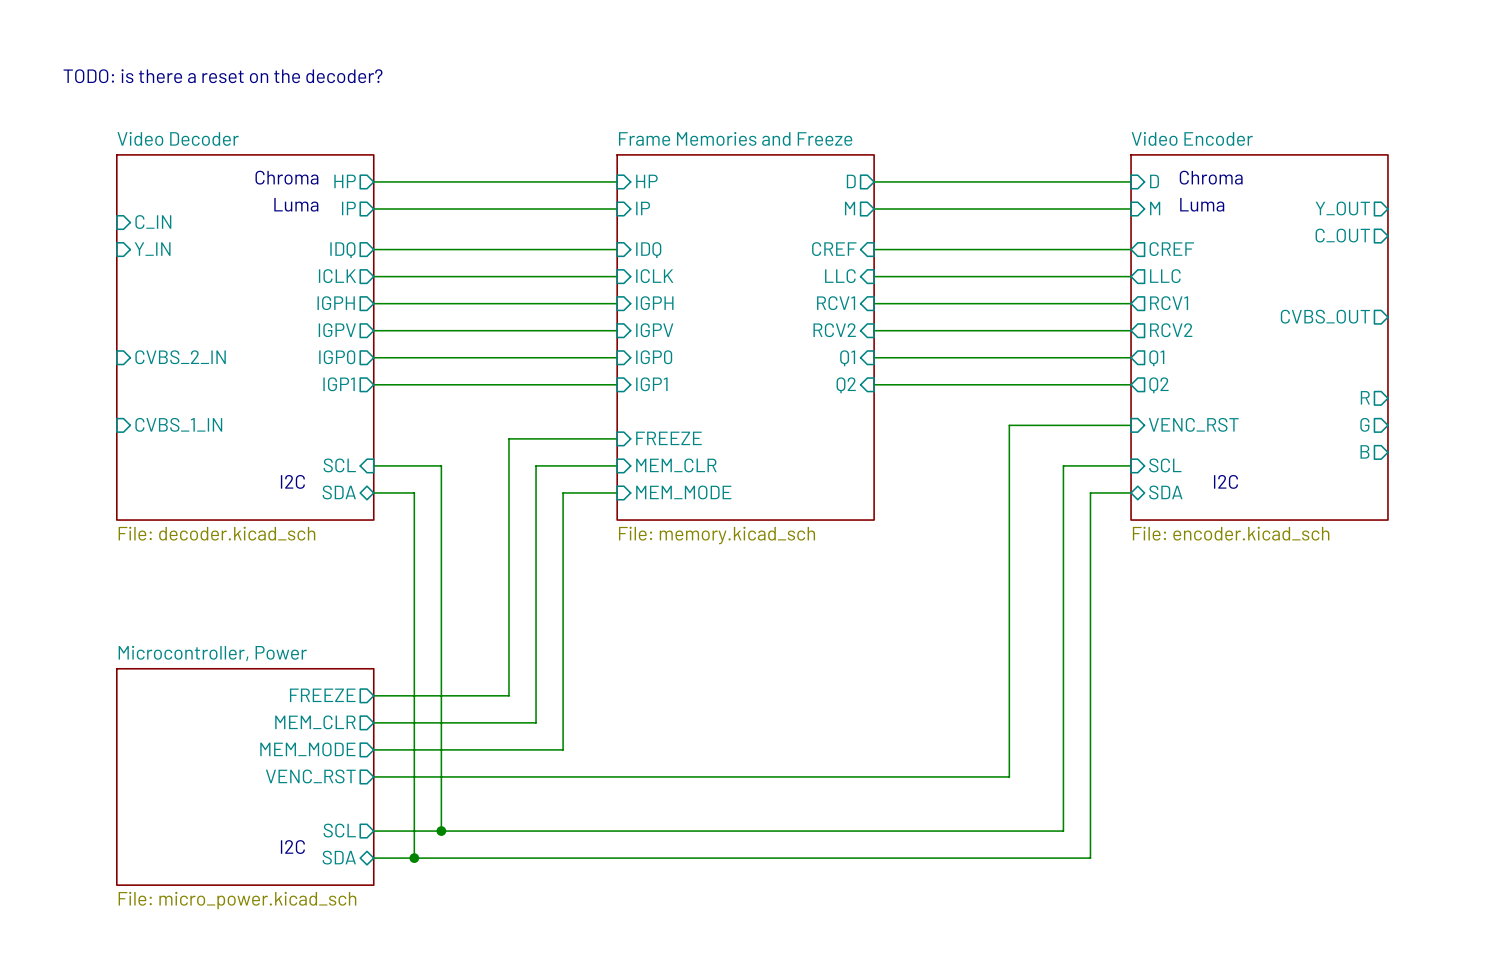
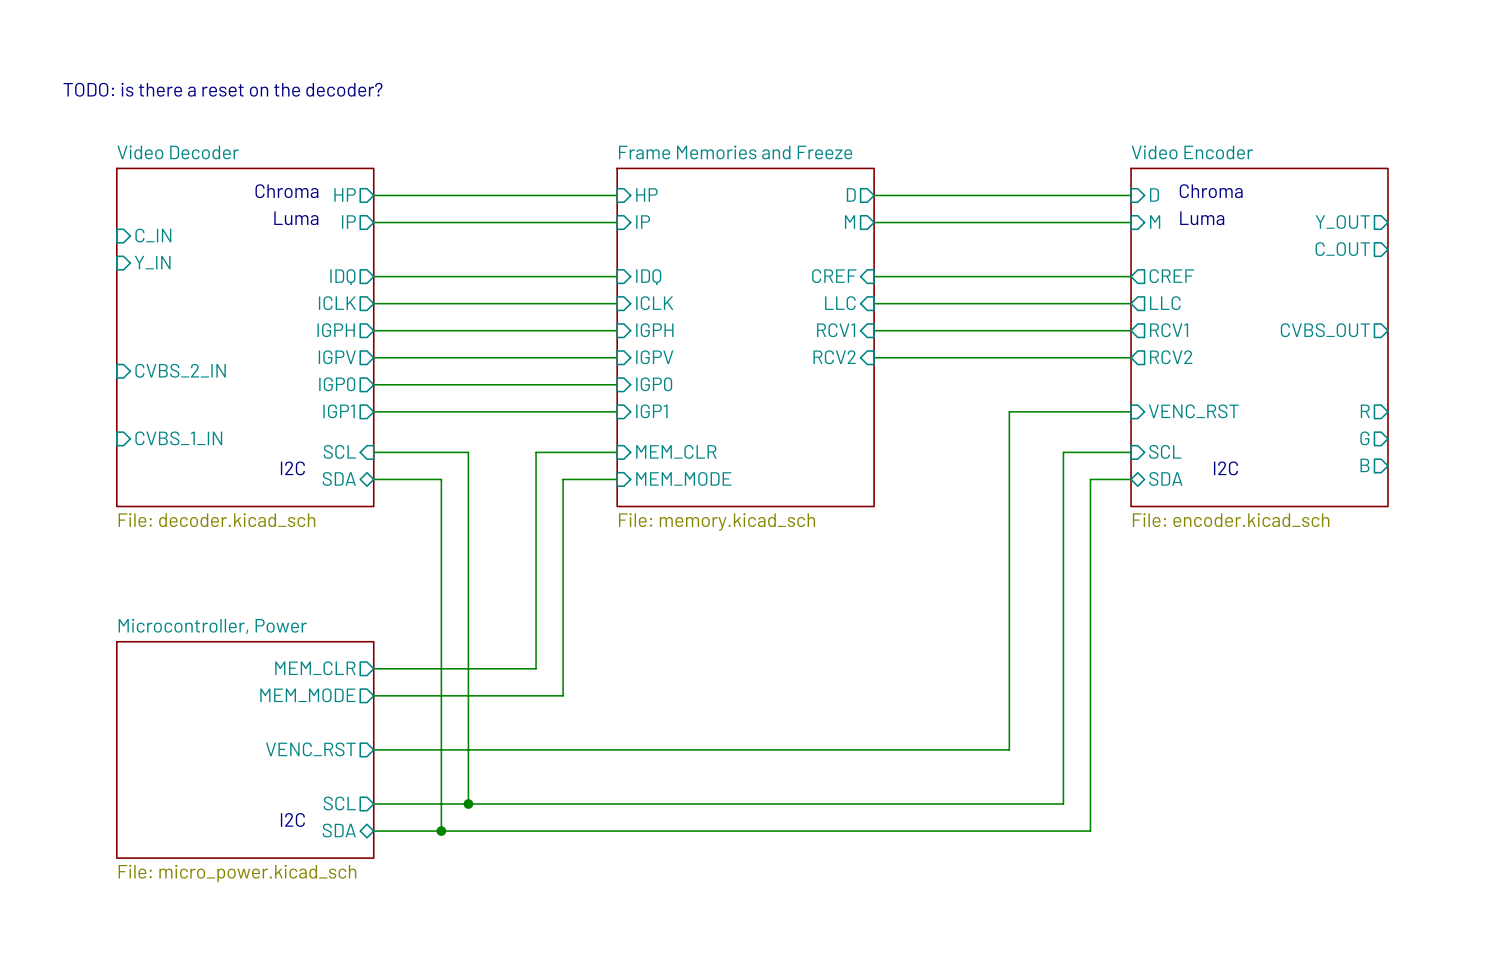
text position: TODO: is there a reset on the decoder? (223, 76) -> TODO: is there a reset on the decoder? (223, 89)
sheet Video Decoder shape: [116, 154, 375, 521] -> [116, 167, 375, 508]
sheet Frame Memories and Freeze shape: [616, 154, 875, 521] -> [616, 167, 875, 508]
sheet Video Encoder shape: [1130, 154, 1389, 521] -> [1130, 167, 1389, 508]
text position: Chroma (286, 177) -> Chroma (286, 191)
text position: Chroma (1211, 177) -> Chroma (1211, 191)
sheet pin position: HP (345, 181) -> HP (345, 194)
wire: (373, 181) (617, 181) -> (373, 195) (617, 195)
sheet pin position: HP (646, 181) -> HP (646, 194)
sheet pin position: D (851, 181) -> D (851, 194)
wire: (874, 181) (1131, 181) -> (874, 195) (1131, 195)
sheet pin position: D (1154, 181) -> D (1154, 194)
text position: Luma (296, 204) -> Luma (296, 218)
text position: Luma (1202, 204) -> Luma (1202, 218)
sheet pin position: IP (348, 208) -> IP (348, 222)
sheet pin position: IP (643, 208) -> IP (643, 222)
sheet pin position: M (850, 208) -> M (850, 222)
sheet pin position: M (1155, 208) -> M (1155, 222)
sheet pin position: Y_OUT (1342, 208) -> Y_OUT (1342, 222)
wire: (373, 209) (617, 209) -> (373, 222) (617, 222)
wire: (874, 209) (1131, 209) -> (874, 222) (1131, 222)
sheet pin position: C_IN (153, 222) -> C_IN (153, 235)
sheet pin position: C_OUT (1342, 235) -> C_OUT (1342, 249)
sheet pin position: Y_IN (152, 249) -> Y_IN (152, 262)
wire: (373, 249) (617, 249) -> (373, 411) (617, 411)
sheet pin: CREF (834, 249) -> none
wire: (874, 249) (1131, 249) -> none
sheet pin: CREF (1171, 249) -> none
sheet pin: IDQ (342, 250) -> none
sheet pin: IDQ (648, 250) -> none
sheet pin: ICLK (337, 276) -> IDQ (342, 277)
sheet pin: ICLK (654, 276) -> IDQ (648, 277)
sheet pin: LLC (840, 276) -> CREF (834, 276)
sheet pin: LLC (1165, 276) -> CREF (1171, 276)
sheet pin: IGPH (336, 303) -> ICLK (337, 303)
sheet pin: IGPH (654, 303) -> ICLK (654, 303)
sheet pin: RCV1 (836, 303) -> LLC (840, 303)
sheet pin: RCV1 (1169, 303) -> LLC (1165, 303)
sheet pin position: CVBS_OUT (1325, 316) -> CVBS_OUT (1325, 330)
sheet pin: IGPV (337, 330) -> IGPH (336, 330)
sheet pin: IGPV (654, 330) -> IGPH (654, 330)
sheet pin: RCV2 (834, 330) -> RCV1 (836, 330)
sheet pin: RCV2 (1171, 330) -> RCV1 (1169, 330)
sheet pin position: CVBS_2_IN (180, 357) -> CVBS_2_IN (180, 370)
sheet pin: IGP0 (337, 357) -> IGPV (337, 357)
sheet pin: IGP0 (654, 357) -> IGPV (654, 357)
sheet pin: Q1 (847, 358) -> RCV2 (834, 357)
sheet pin: Q1 (1156, 358) -> RCV2 (1171, 357)
sheet pin: IGP1 (339, 384) -> IGP0 (337, 384)
sheet pin: IGP1 (651, 384) -> IGP0 (654, 384)
wire: (874, 384) (1131, 384) -> none
sheet pin: Q2 (846, 385) -> none
sheet pin: Q2 (1158, 385) -> none
sheet pin position: R (1365, 397) -> R (1365, 411)
sheet pin: none -> IGP1 (339, 411)
sheet pin: none -> IGP1 (651, 411)
sheet pin position: CVBS_1_IN (178, 424) -> CVBS_1_IN (178, 438)
sheet pin position: VENC_RST (1193, 424) -> VENC_RST (1193, 411)
sheet pin position: G (1364, 424) -> G (1364, 438)
wire: (1009, 425) (1131, 425) -> (1009, 425) (1009, 411) (1131, 411)
wire: (617, 438) (508, 438) (508, 695) -> none
sheet pin: FREEZE (668, 438) -> none
sheet pin position: B (1364, 451) -> B (1364, 465)
wire: none -> (373, 452) (468, 452) (468, 804)
sheet pin position: SCL (339, 465) -> SCL (339, 451)
wire: (373, 465) (441, 465) (441, 479) -> (373, 479) (441, 479)
wire: (536, 465) (617, 465) -> (536, 465) (536, 452) (617, 452)
sheet pin position: MEM_CLR (676, 465) -> MEM_CLR (676, 451)
wire: (1063, 465) (1131, 465) -> (1063, 465) (1063, 452) (1131, 452)
sheet pin position: SCL (1165, 465) -> SCL (1165, 451)
text position: I2C (292, 481) -> I2C (292, 468)
text position: I2C (1225, 481) -> I2C (1225, 468)
sheet pin position: SDA (339, 492) -> SDA (339, 478)
wire: (373, 492) (414, 492) (414, 858) -> none
wire: (563, 492) (617, 492) -> (563, 492) (563, 479) (617, 479)
sheet pin position: MEM_MODE (683, 492) -> MEM_MODE (683, 478)
wire: (1090, 492) (1131, 492) -> (1090, 492) (1090, 479) (1131, 479)
sheet pin position: SDA (1165, 492) -> SDA (1165, 478)
wire: (536, 668) (536, 722) (373, 722) -> (536, 668) (373, 668)
sheet pin: FREEZE (322, 695) -> MEM_MODE (307, 695)
wire: (563, 695) (563, 749) -> (563, 695) (508, 695)
sheet pin position: MEM_CLR (315, 722) -> MEM_CLR (315, 668)
sheet pin: MEM_MODE (307, 749) -> VENC_RST (310, 749)
wire: (1009, 749) (1009, 776) (373, 776) -> (1009, 749) (563, 749)
sheet Microcontroller, Power position: (245, 776) -> (245, 749)
sheet pin: VENC_RST (310, 776) -> none
sheet pin: none -> SCL (339, 803)
wire: none -> (373, 804) (1063, 804)
junction: none -> (468, 804)
wire: (1063, 804) (1063, 831) -> (1090, 831) (1063, 831)
sheet pin shape: output (339, 830) -> bidirectional (339, 830)
sheet pin: SCL (339, 830) -> SDA (339, 830)
wire: (1090, 831) (1090, 858) (373, 858) -> none
text position: I2C (292, 847) -> I2C (292, 819)
sheet pin: SDA (339, 857) -> none
junction: (414, 858) -> none

